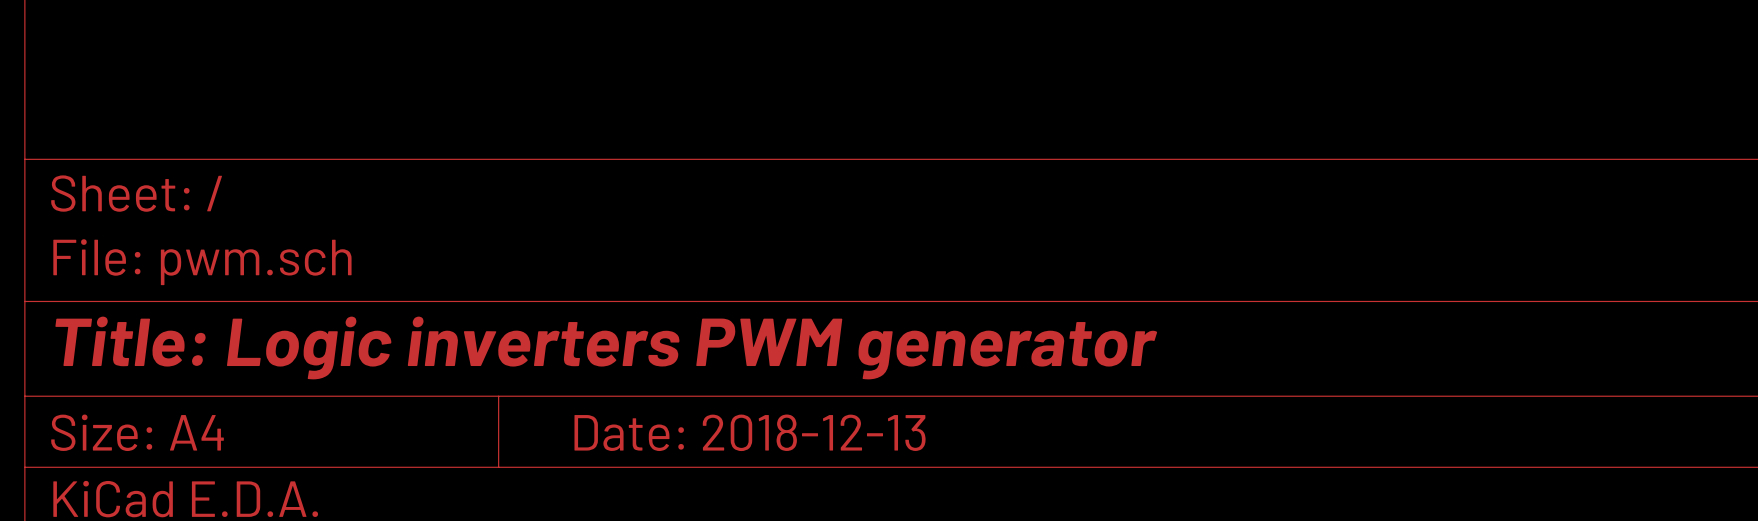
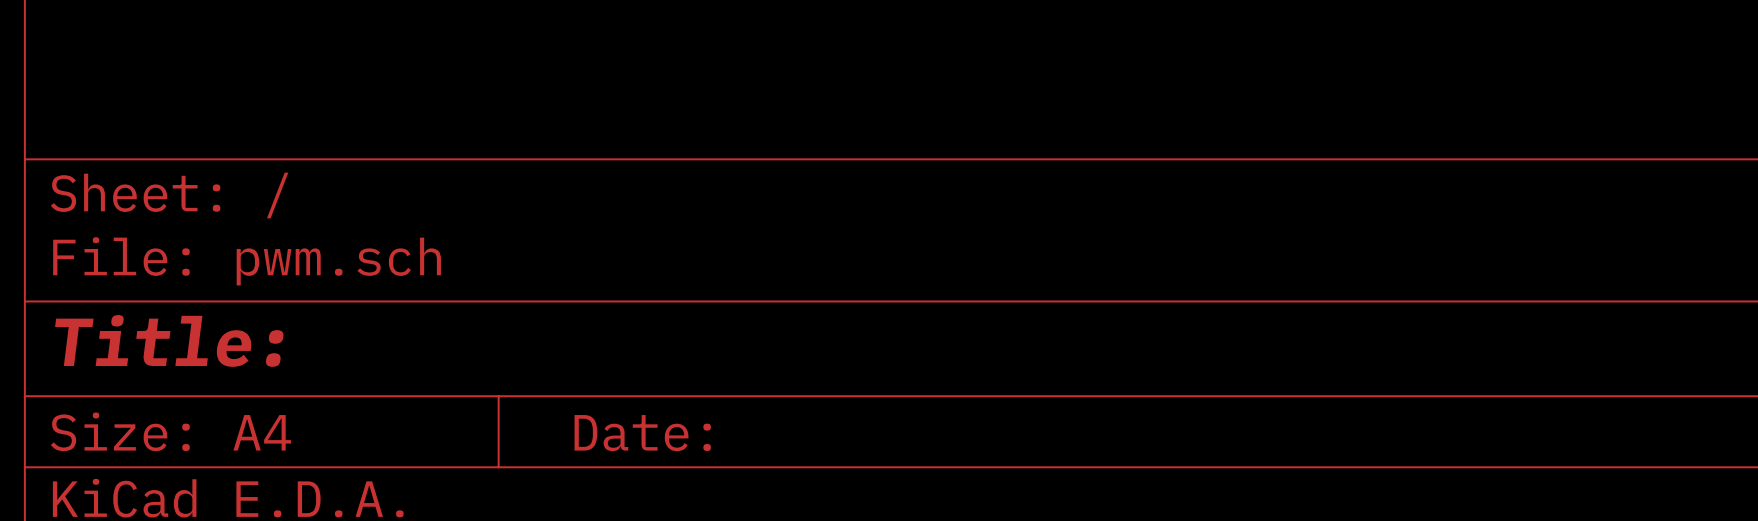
title block: Title: Logic inverters PWM generator (606, 347) -> Title: (169, 340)
title block: Date: 2018-12-13 (750, 432) -> Date: (642, 433)

